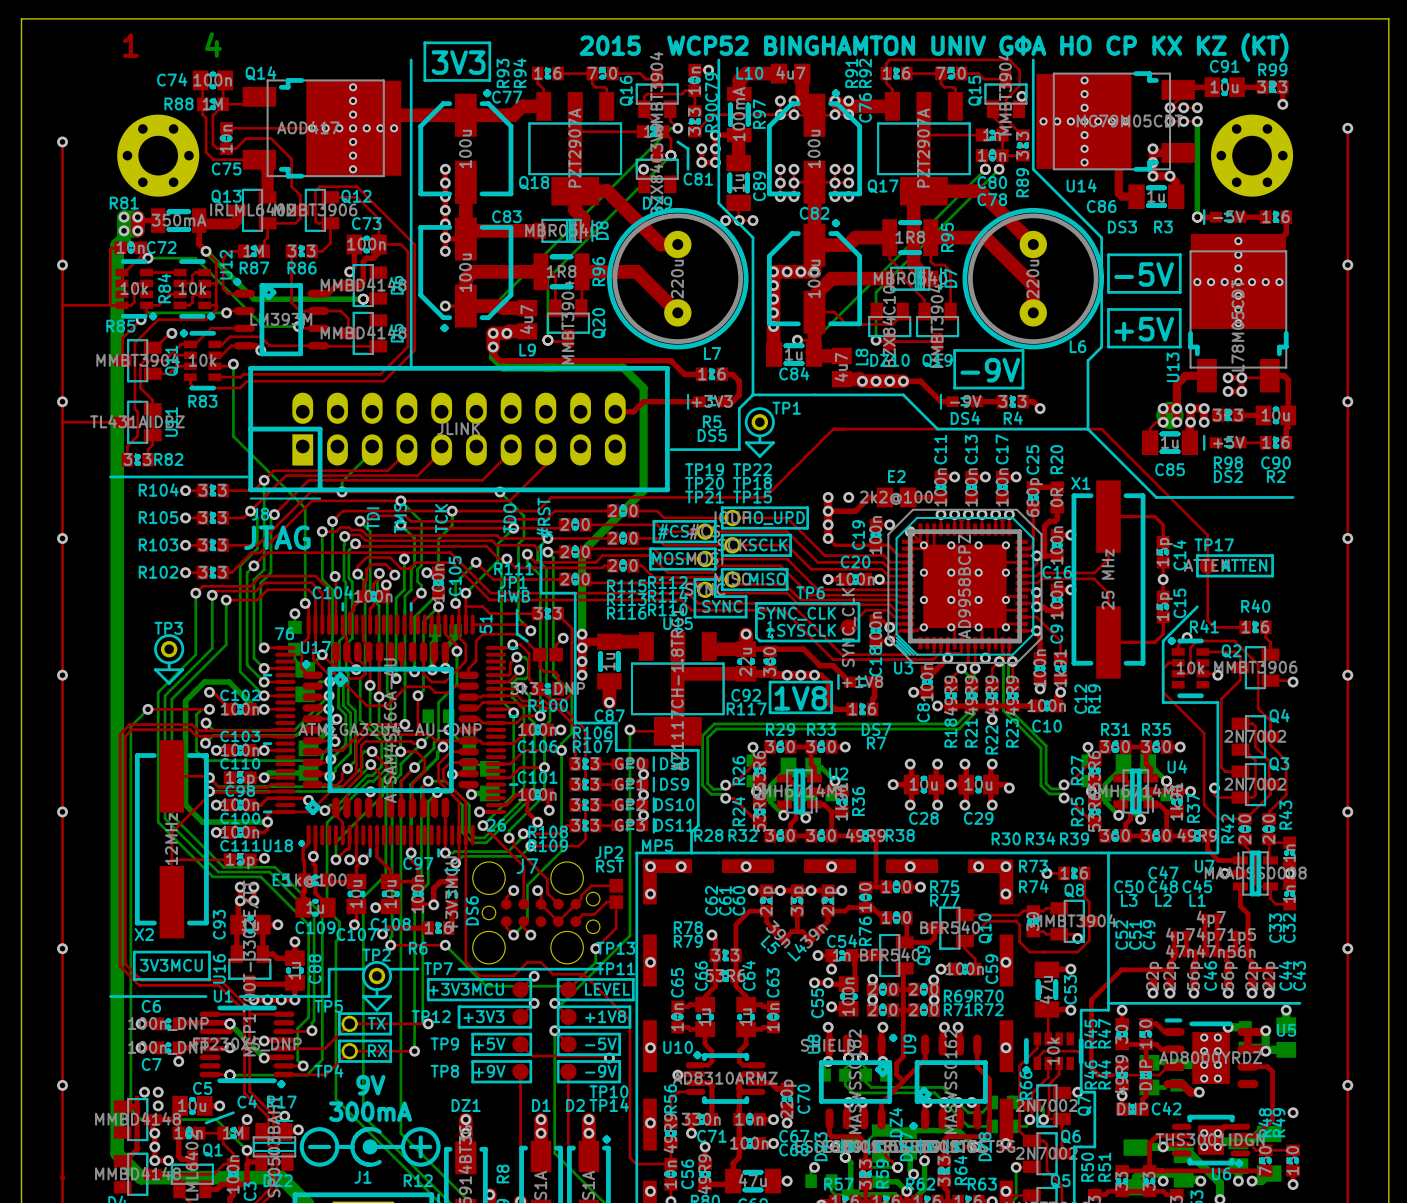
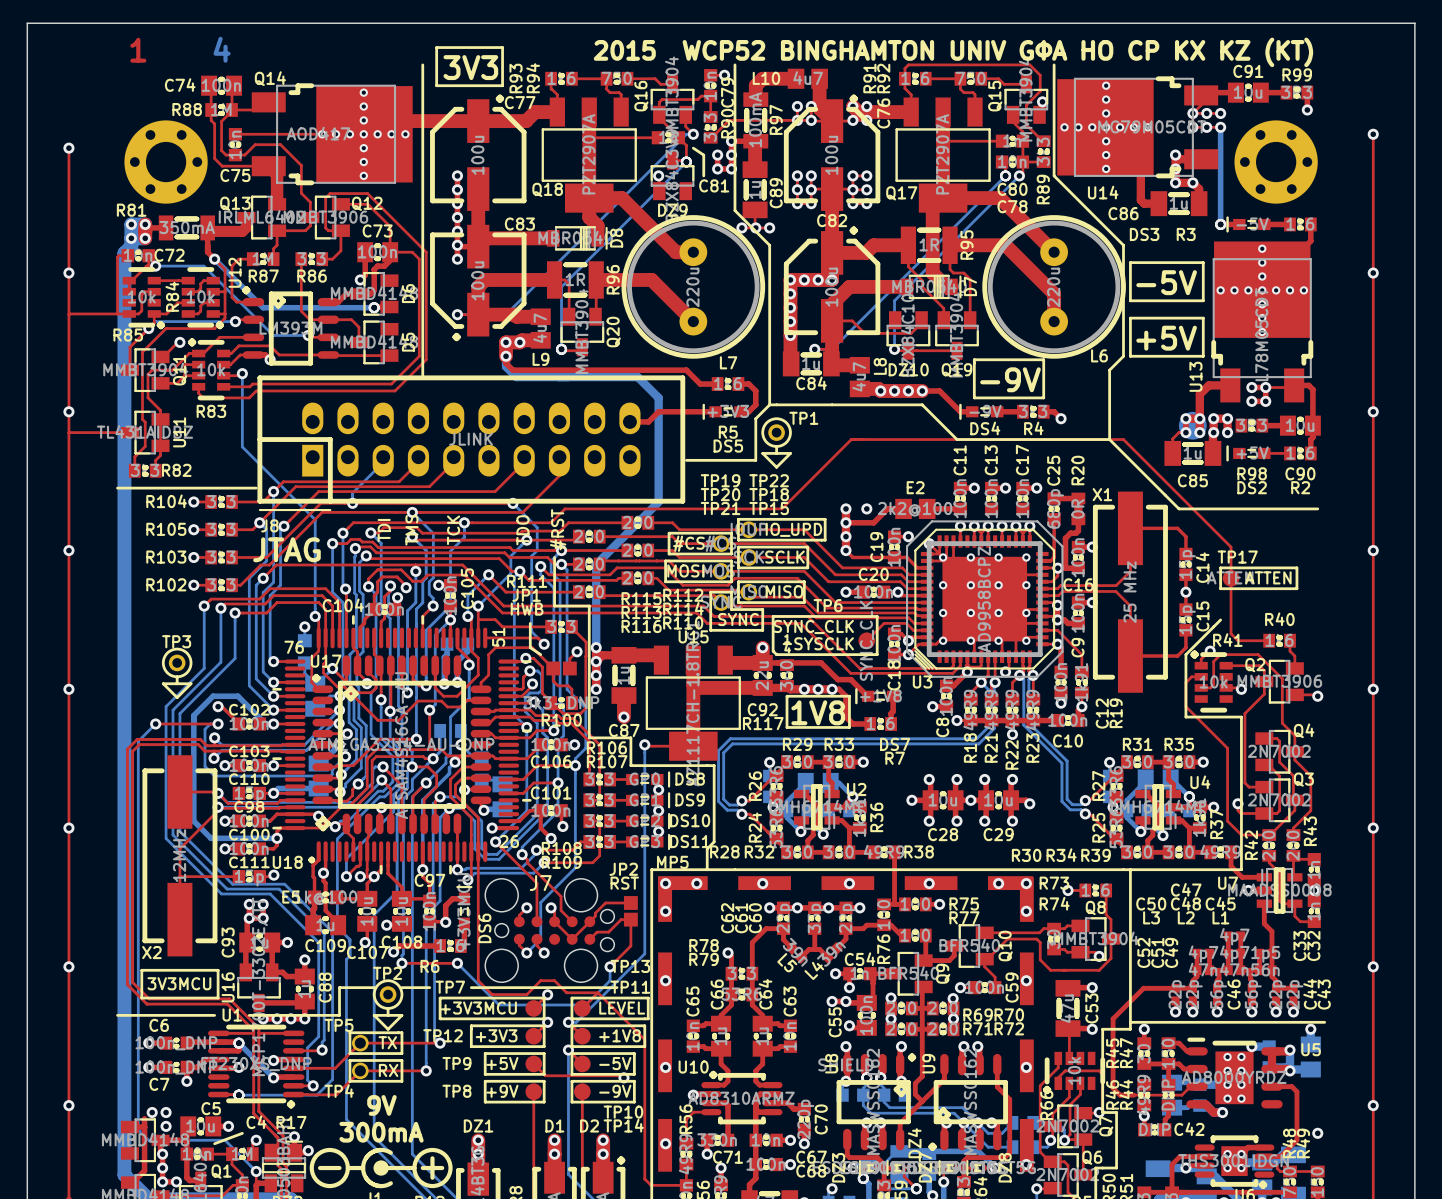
R95 value: 1R8 (910, 237) -> 1R (929, 244)
R96 value: 1R8 (561, 271) -> 1R (575, 279)

